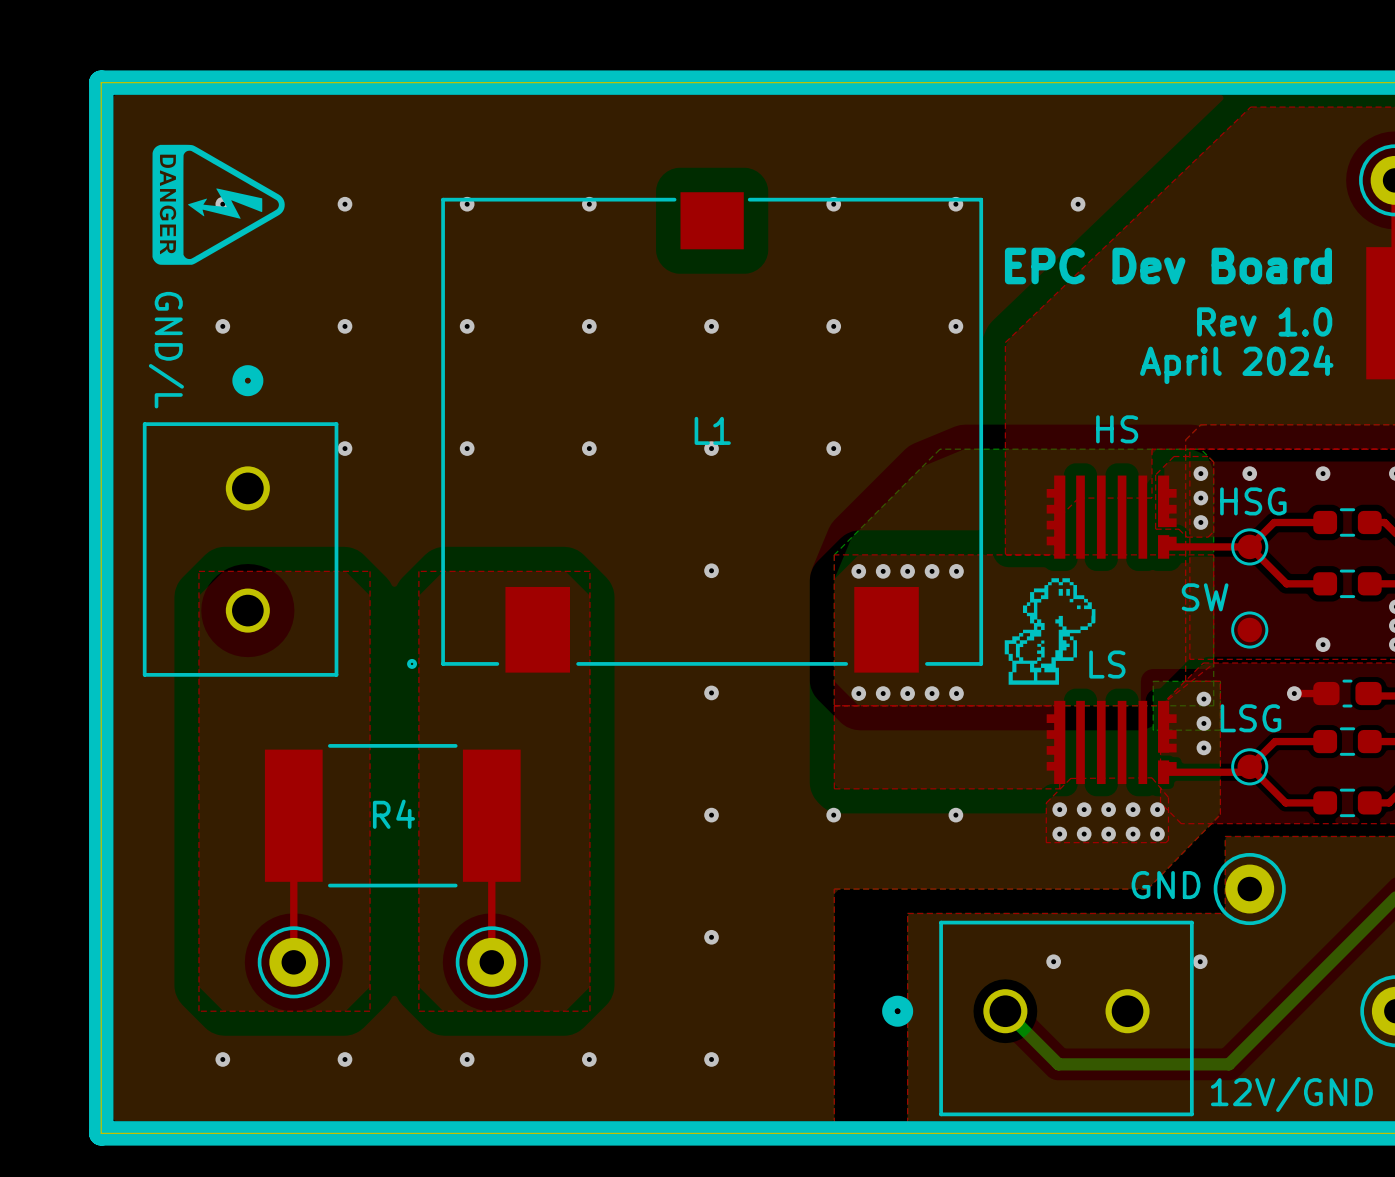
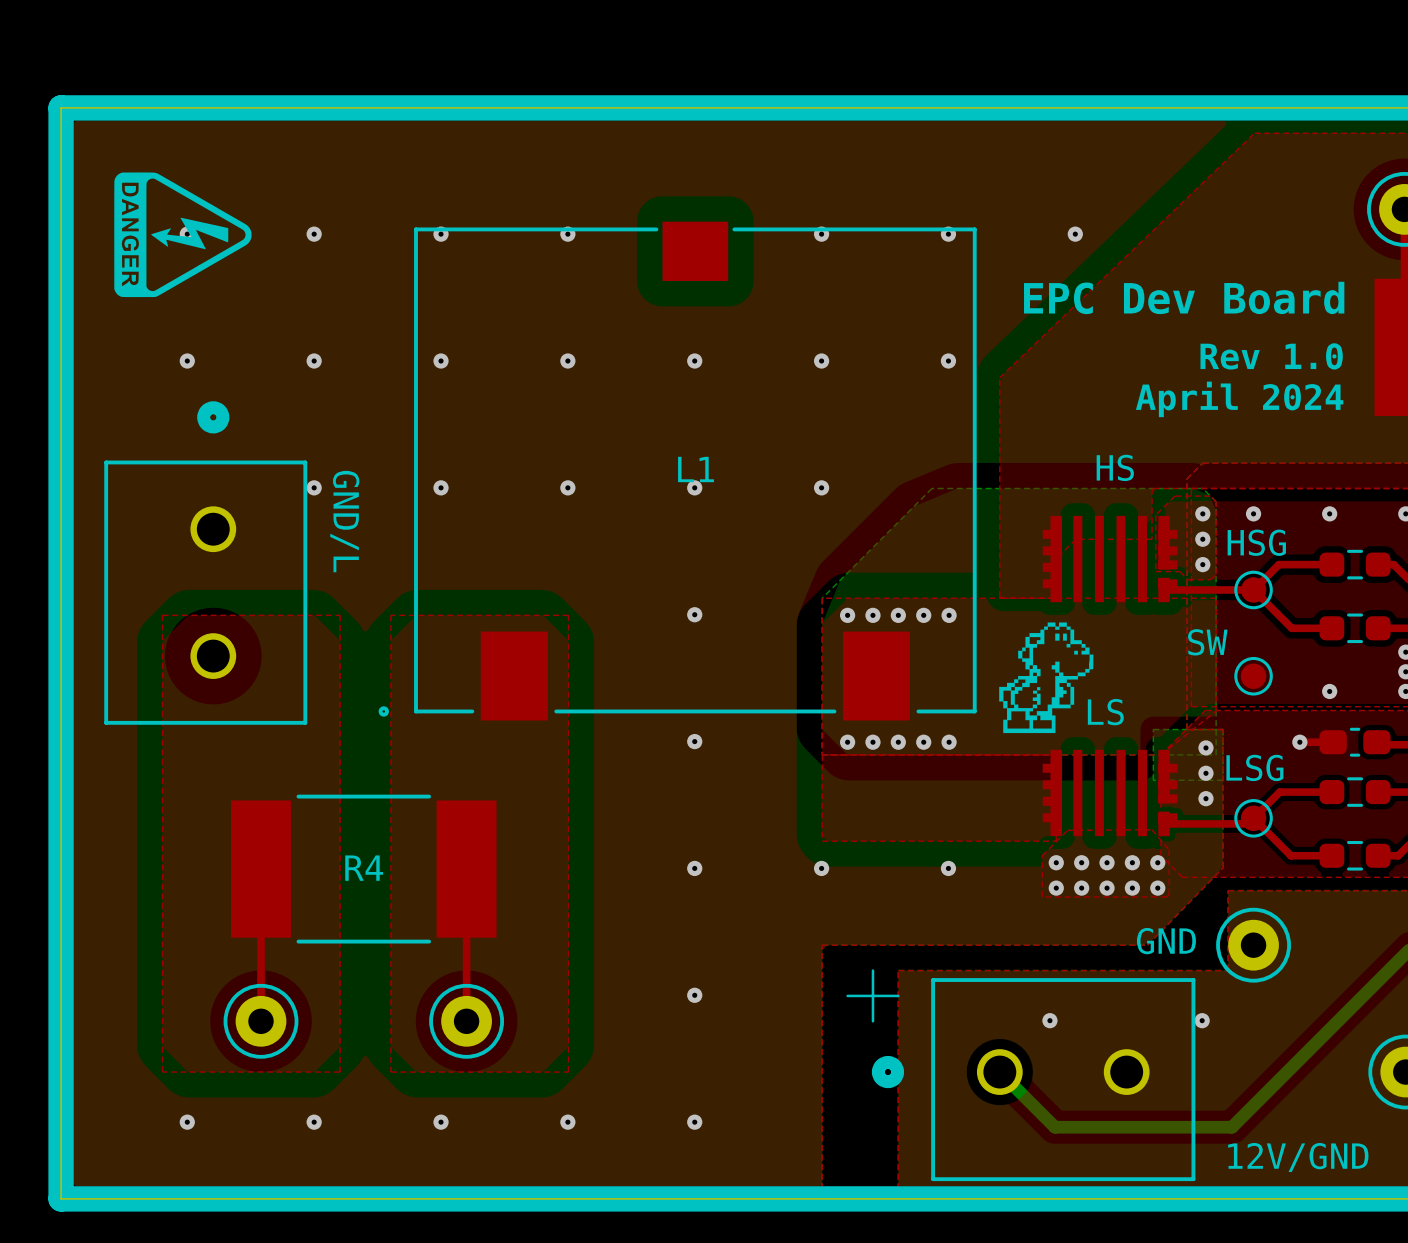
GND/L name position: GND/L (166, 350) -> GND/L (344, 521)
line: none -> (872, 970) (872, 1021)
line: none -> (847, 995) (898, 995)

